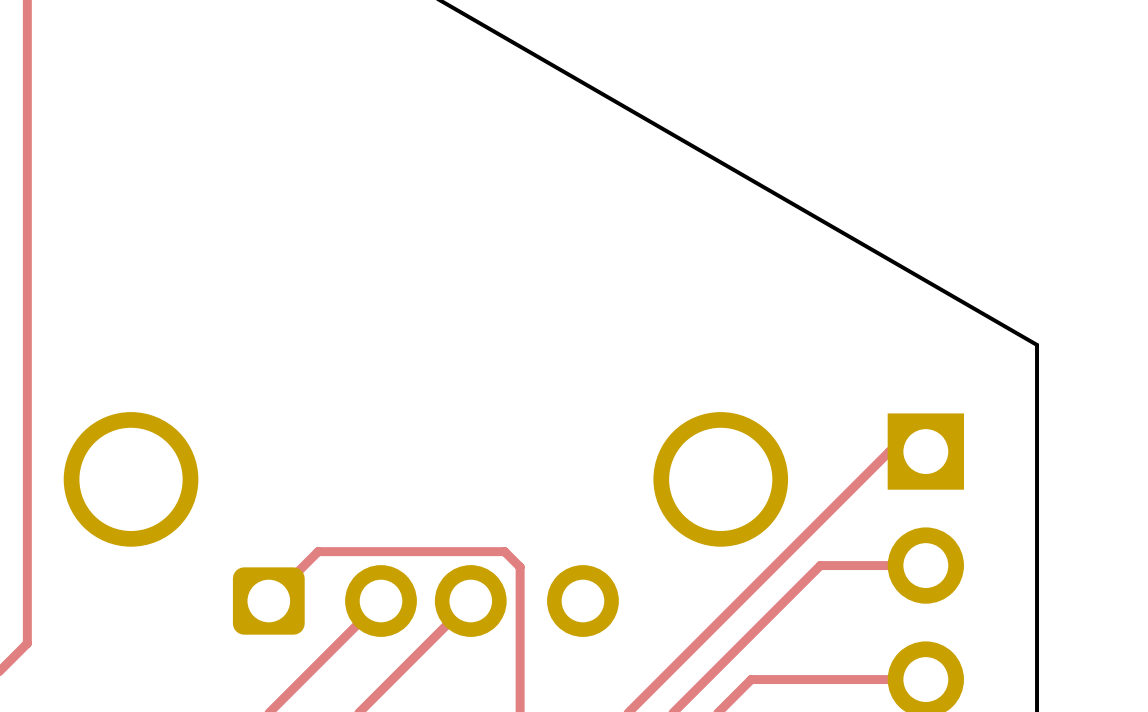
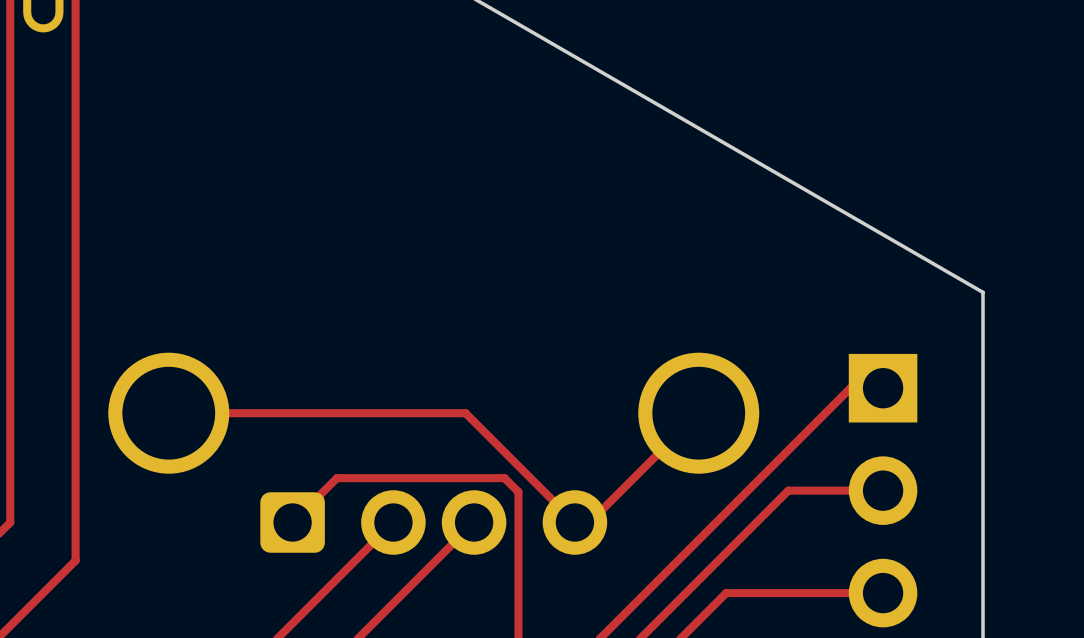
top track: none -> (698, 413) (589, 522) (574, 522) (465, 413) (168, 413)

